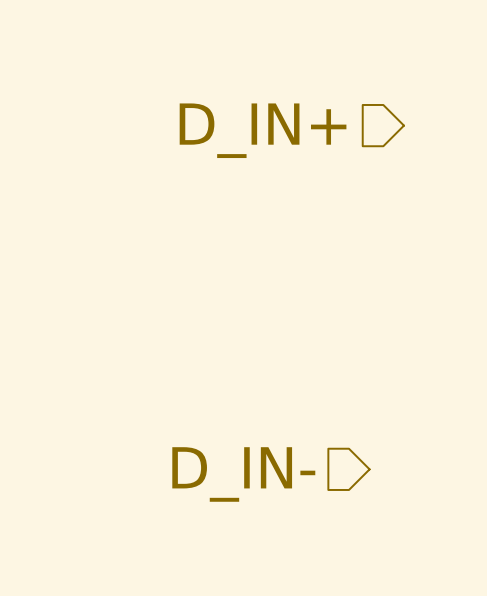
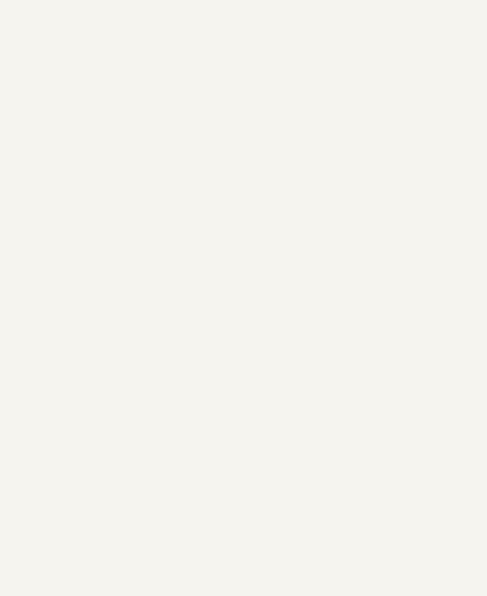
hierarchical label: D_IN+ (263, 130) -> none
hierarchical label: D_IN- (243, 474) -> none

